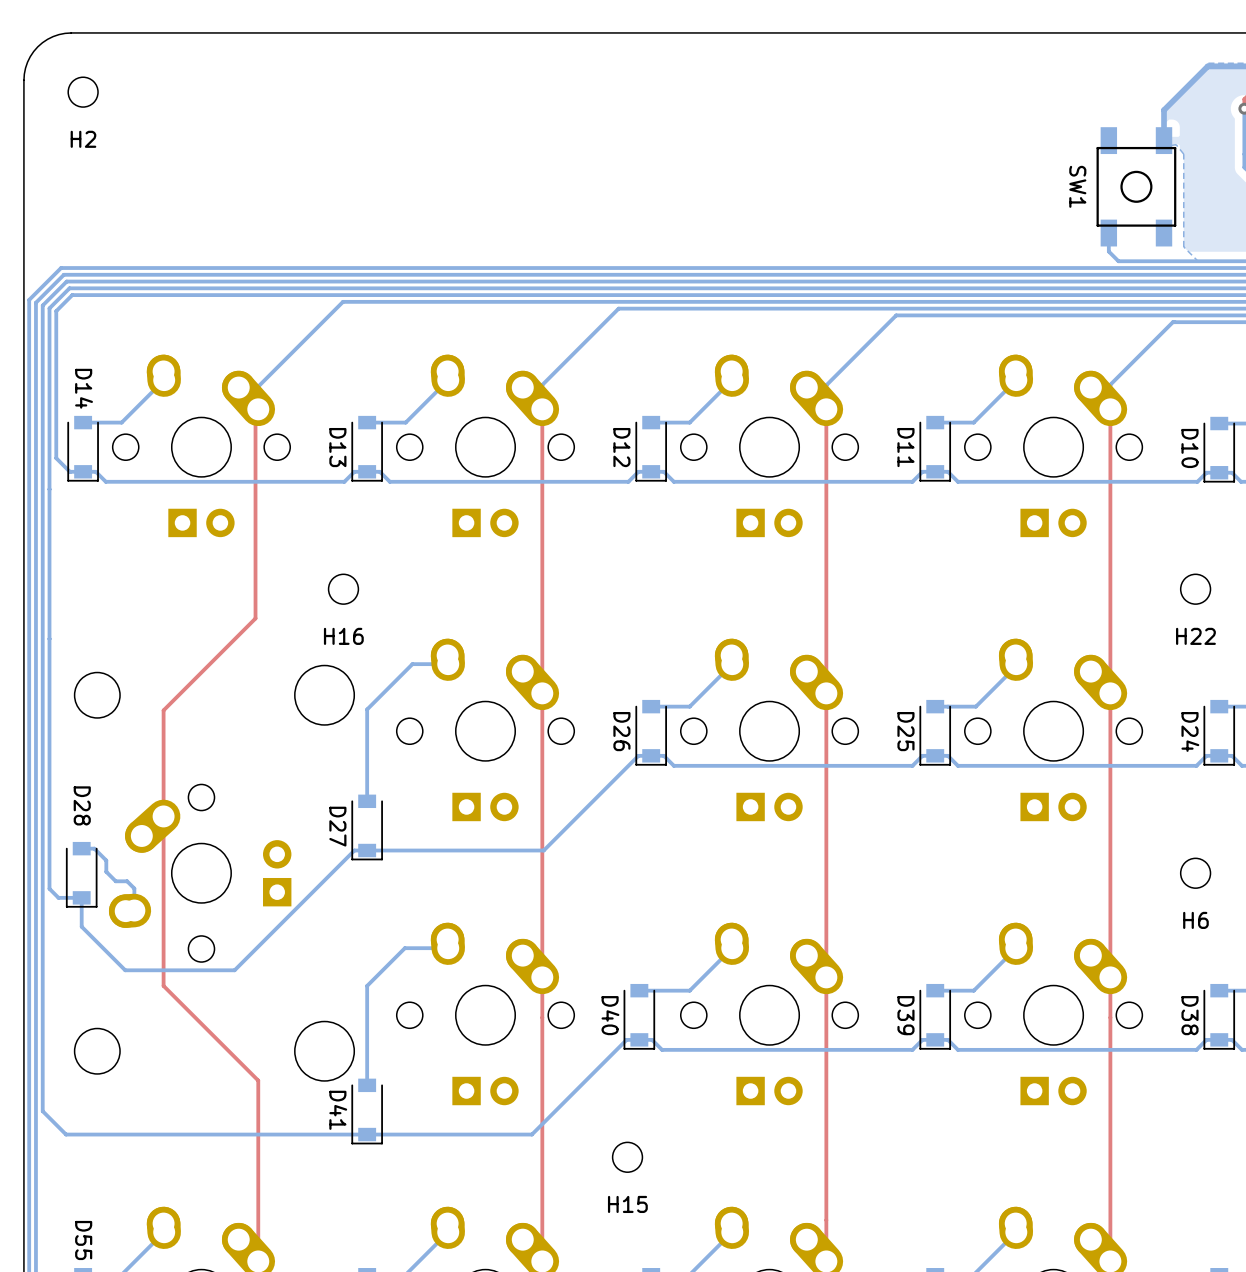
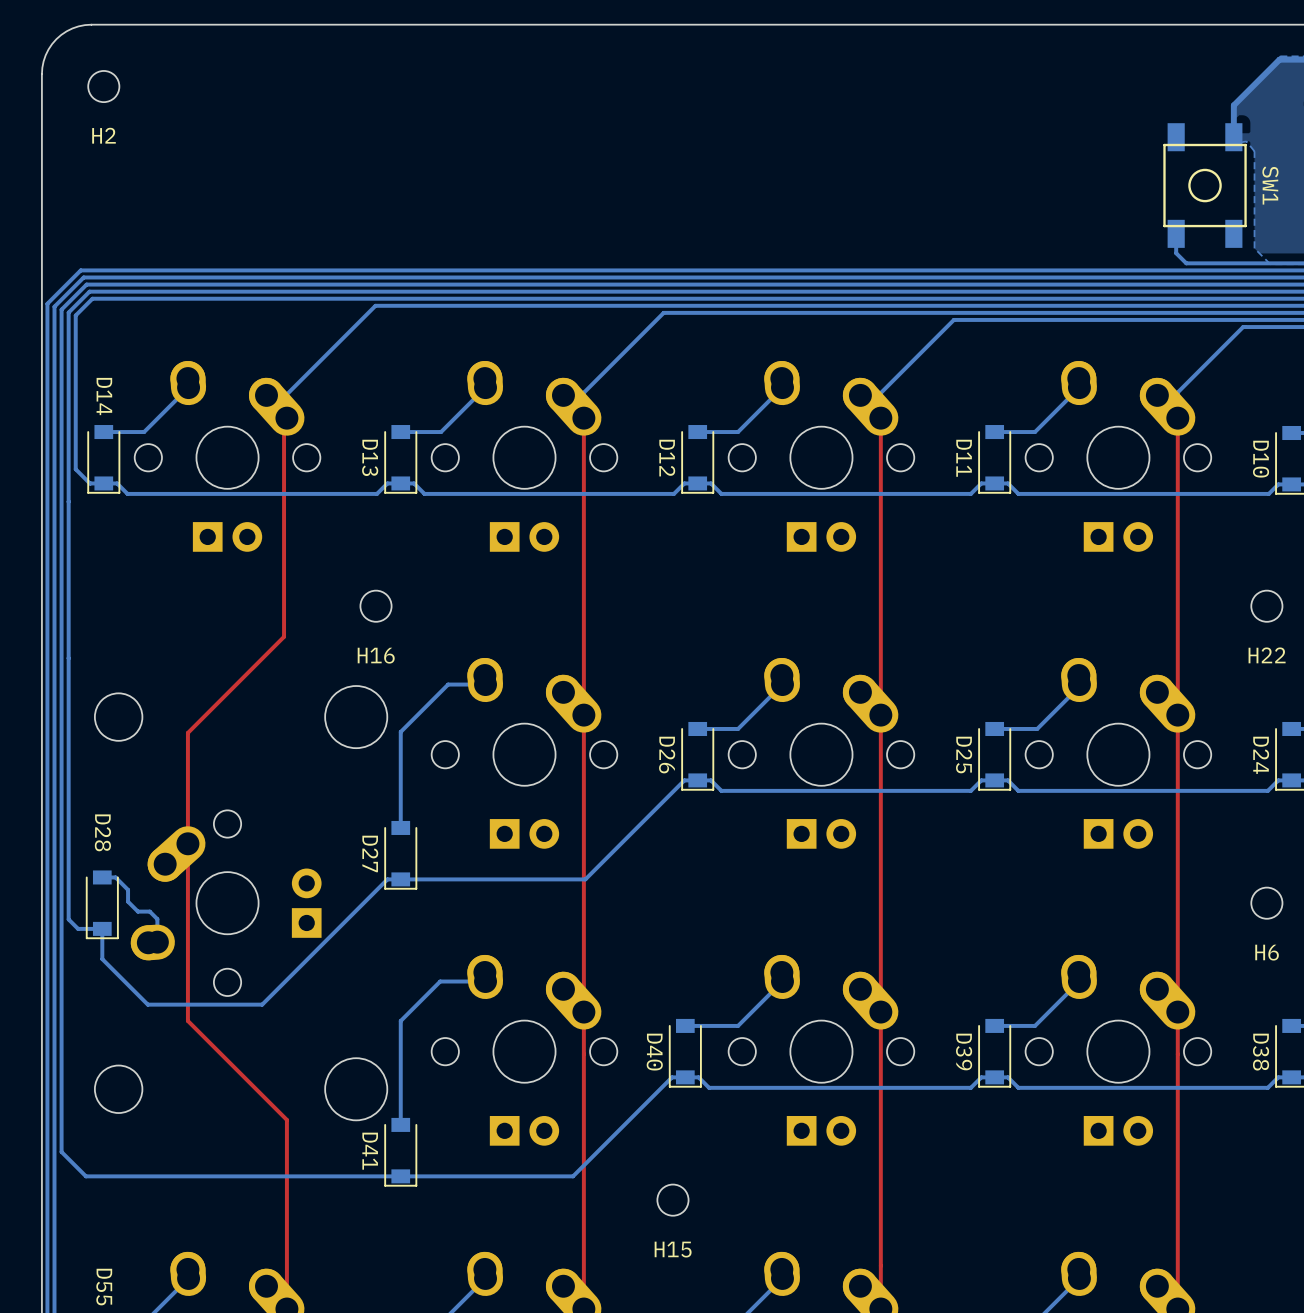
SW1 name position: SW1 (1077, 186) -> SW1 (1270, 185)

